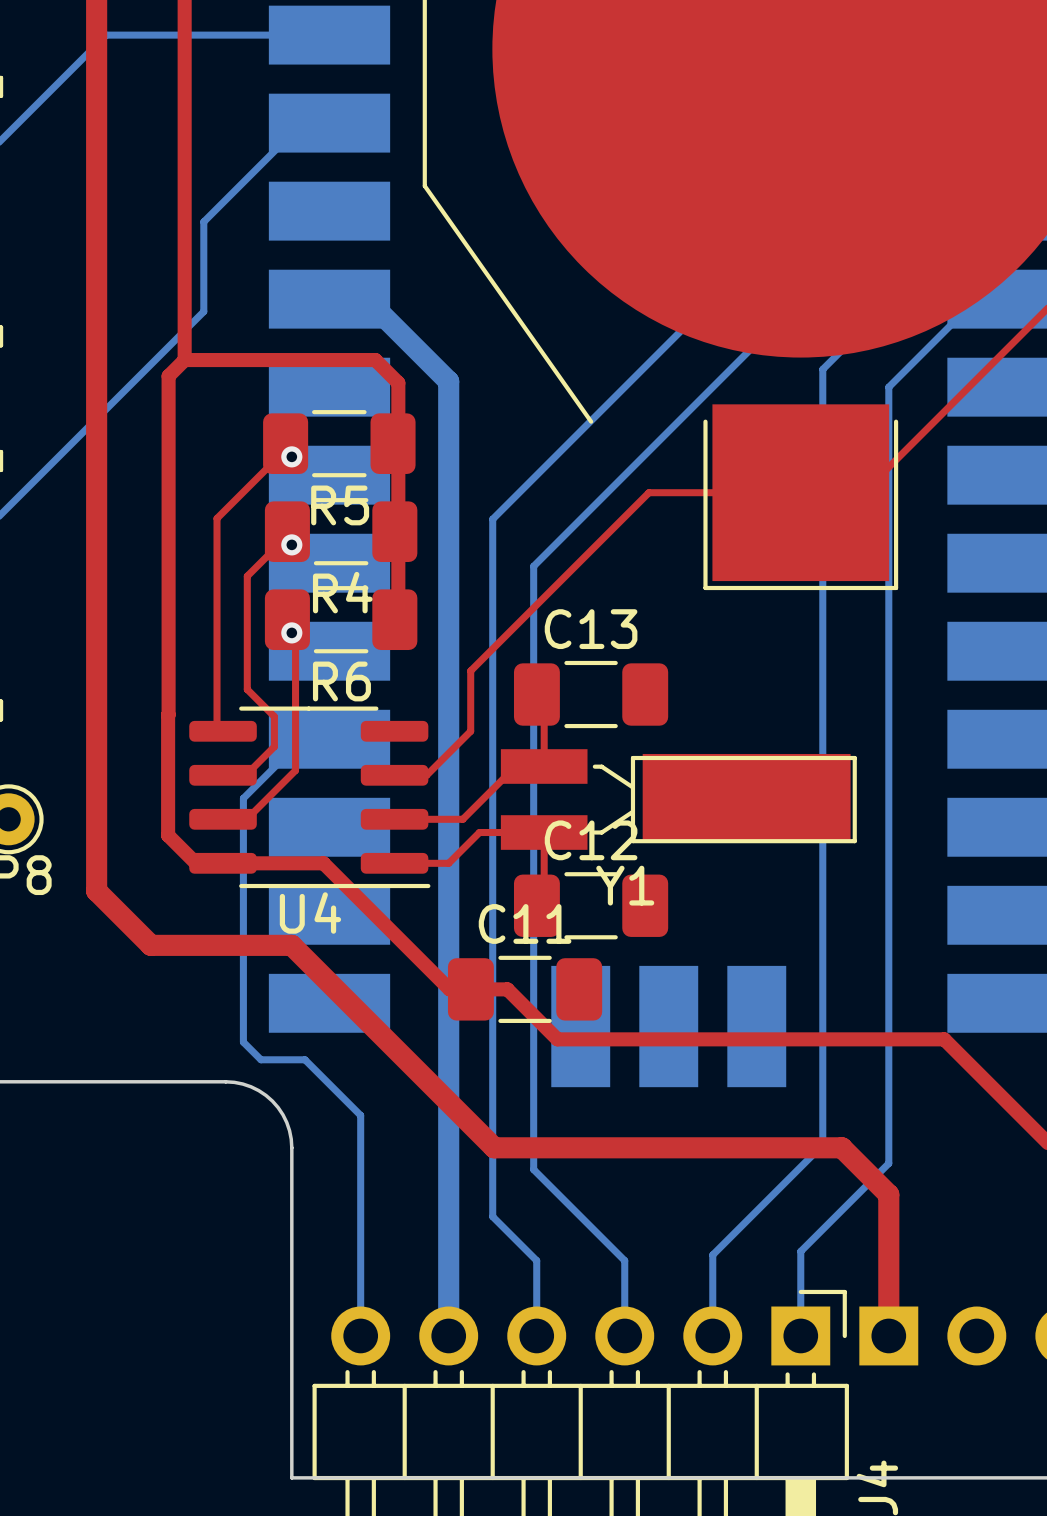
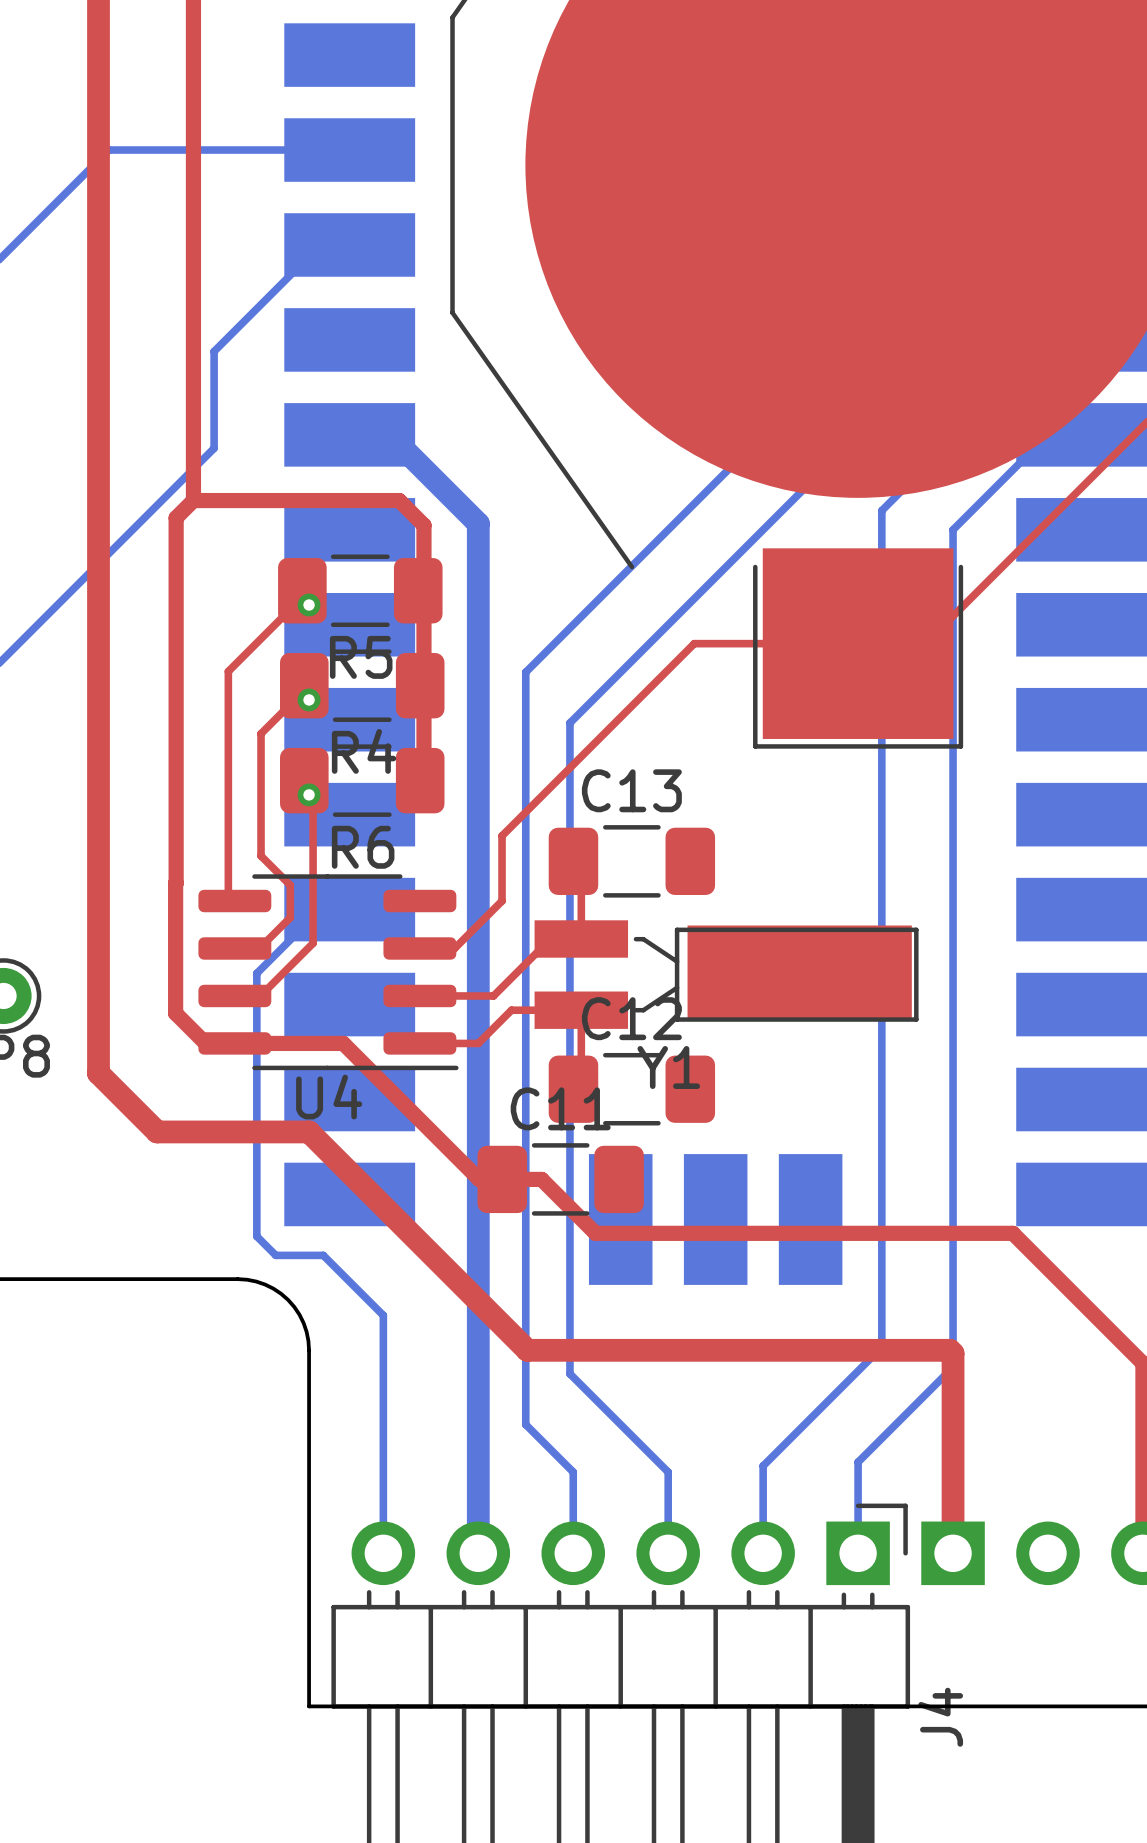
top track: (841, 1147) (888, 1194) -> (902, 1350) (949, 1350) (953, 1353) (953, 1400)

